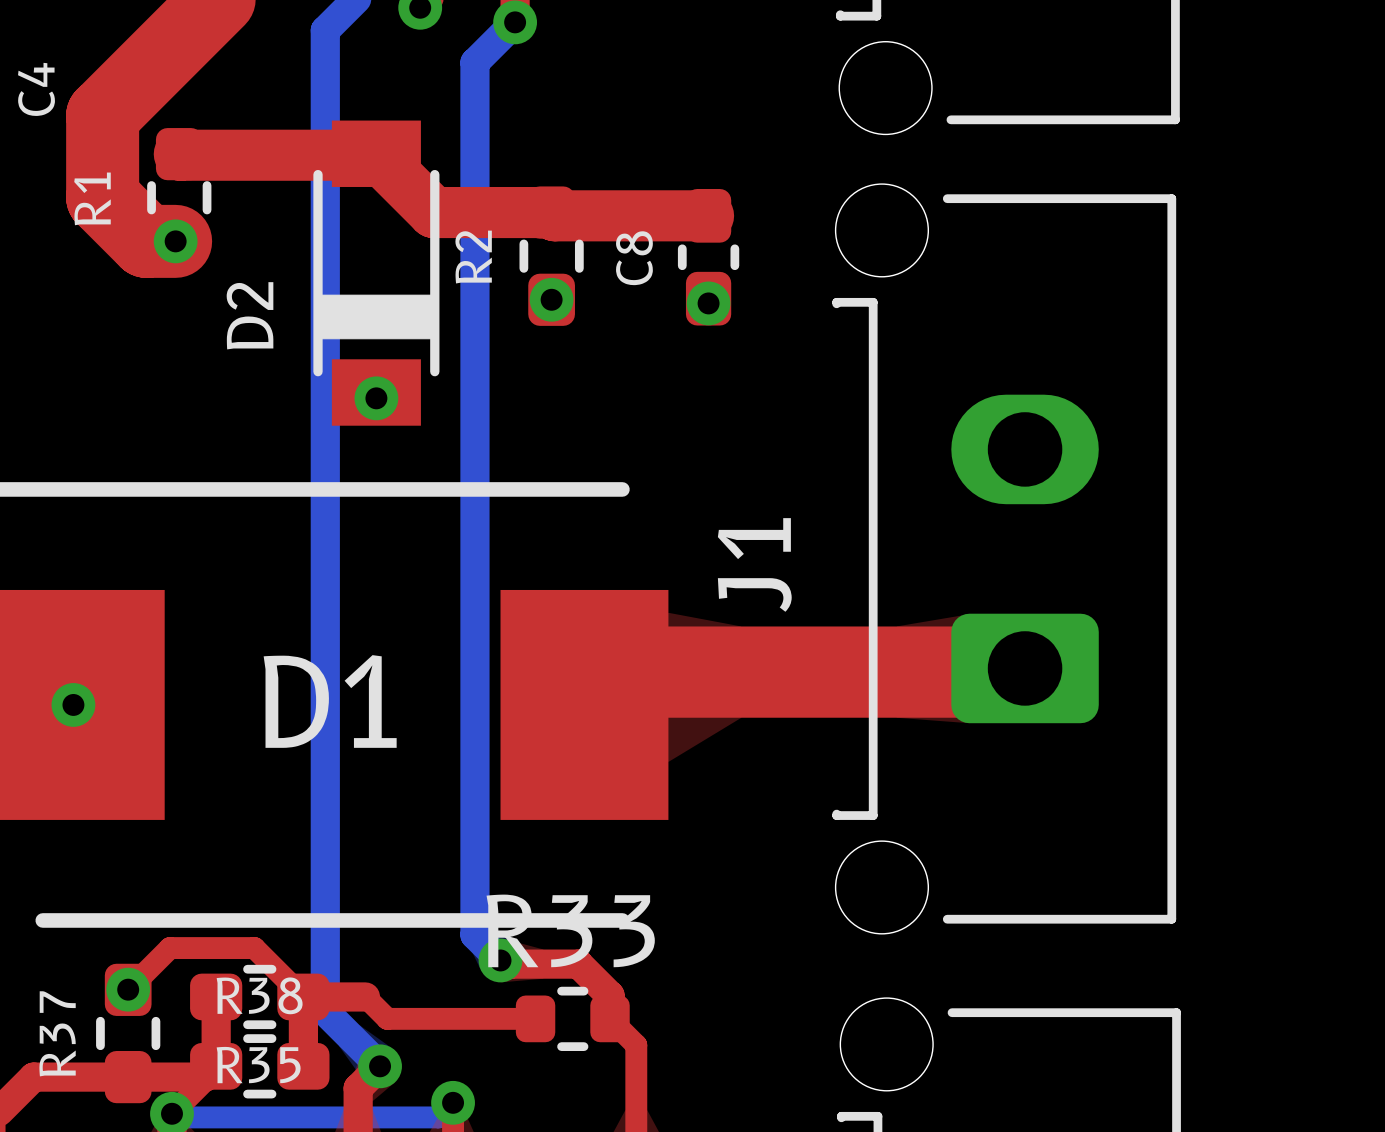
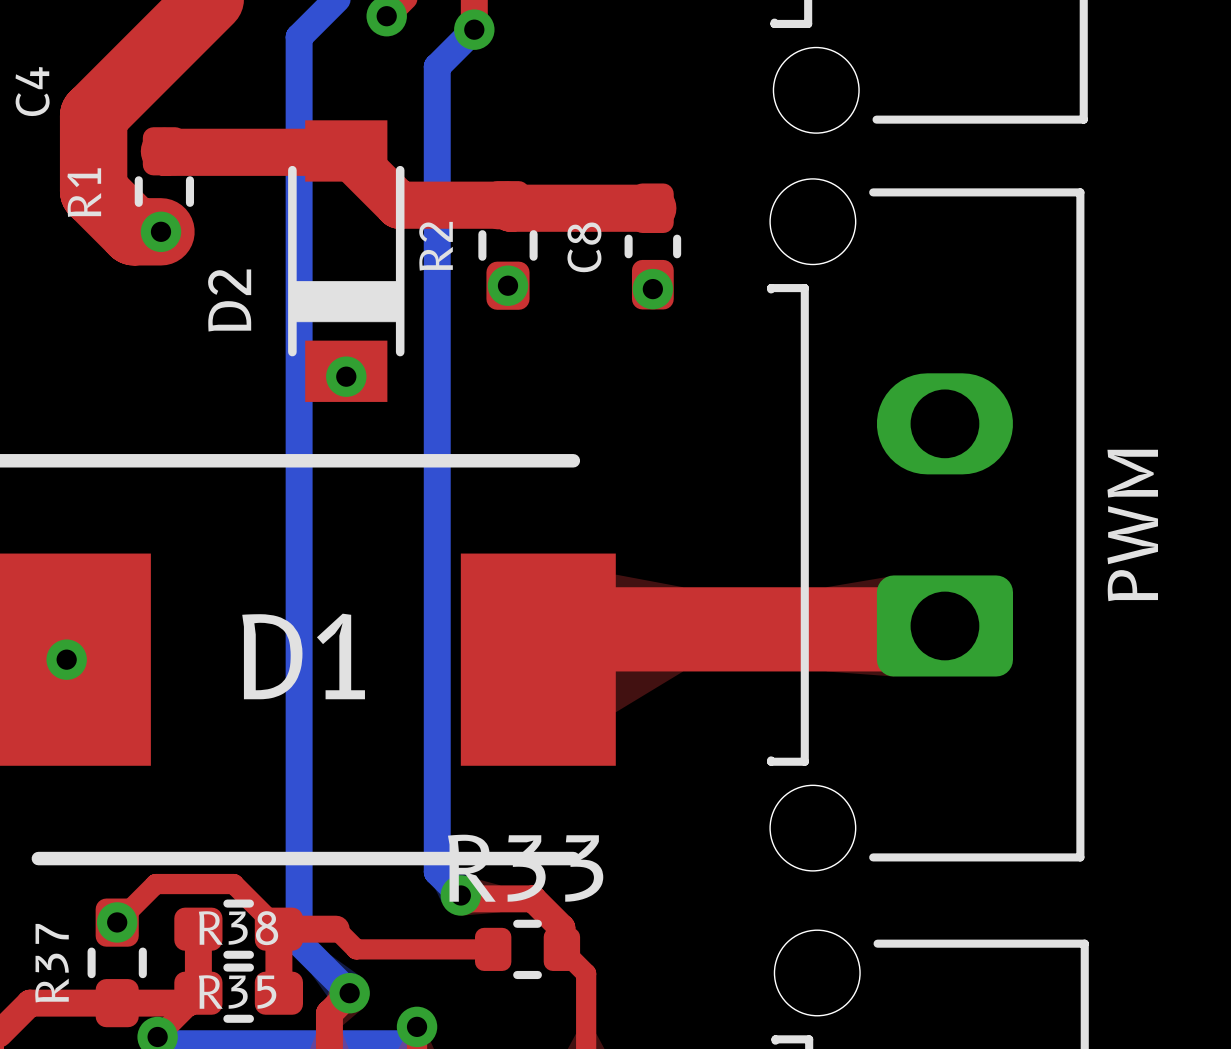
J1 name: J1 (754, 564) -> PWM (1132, 525)

